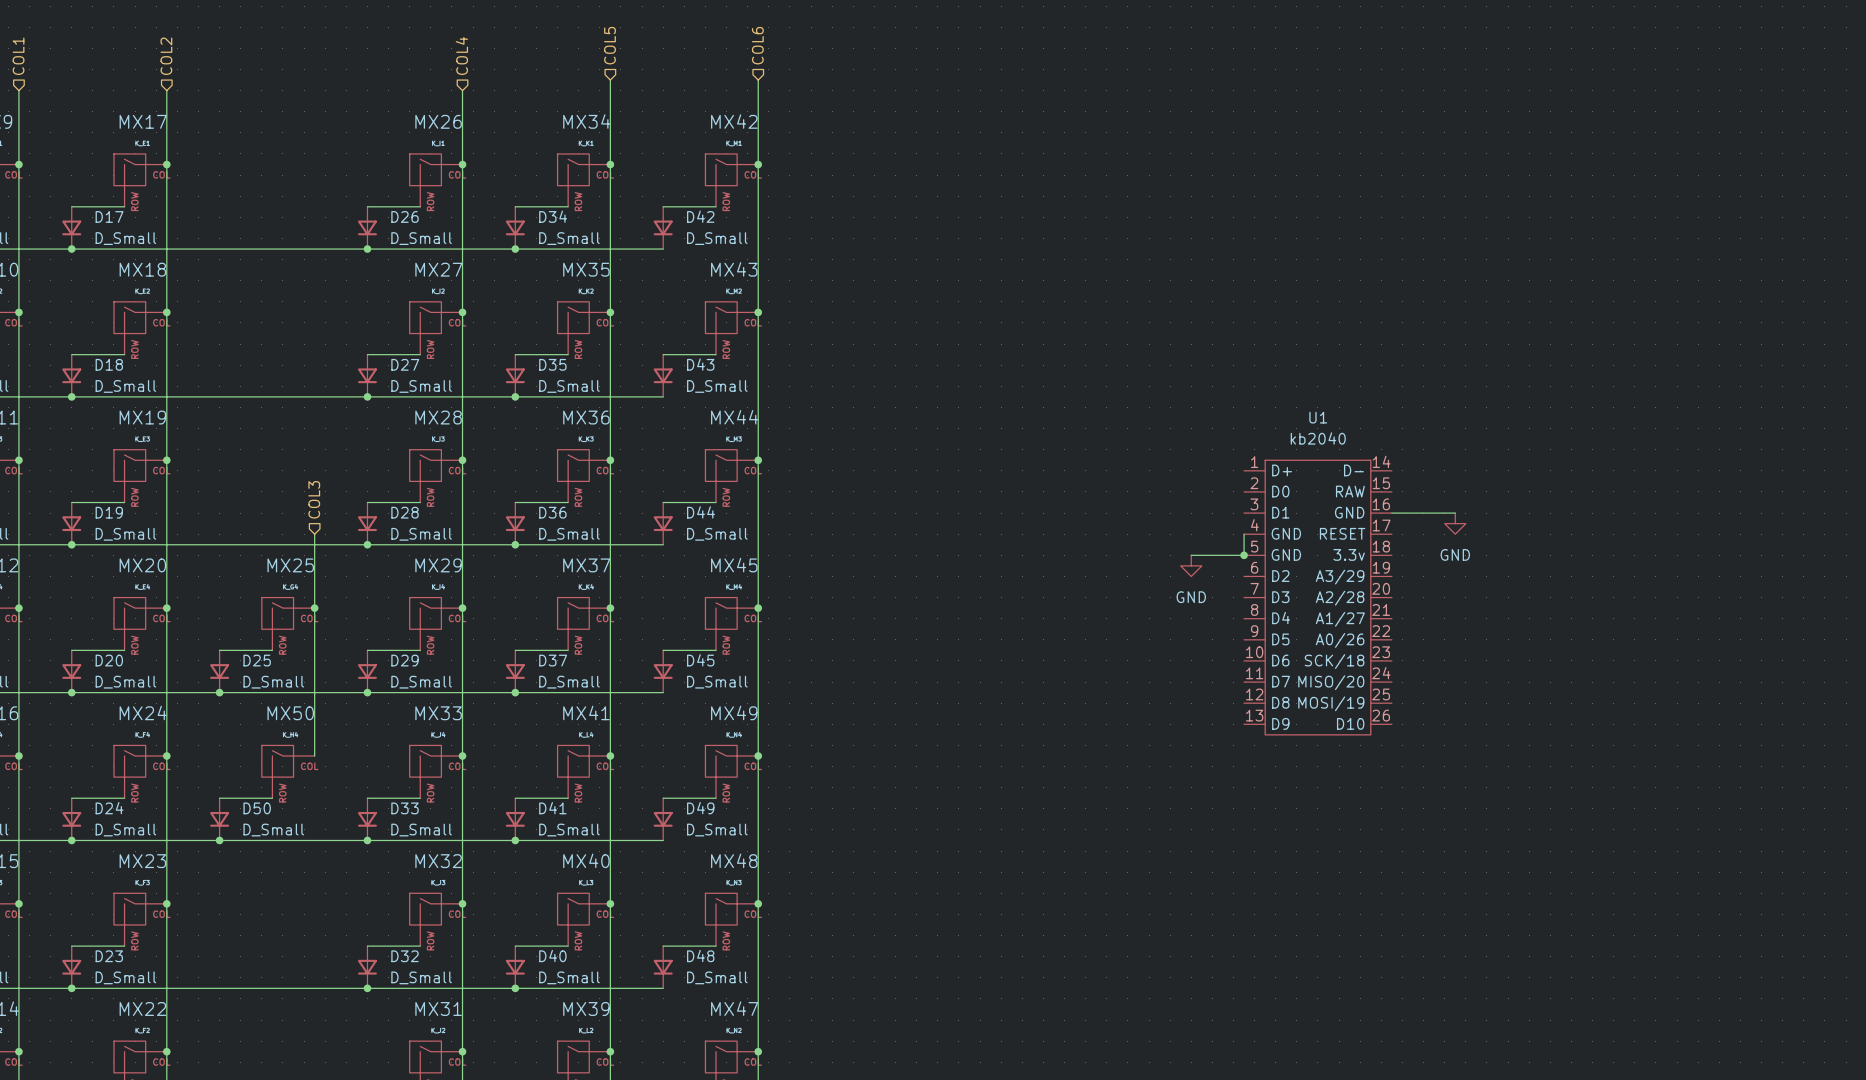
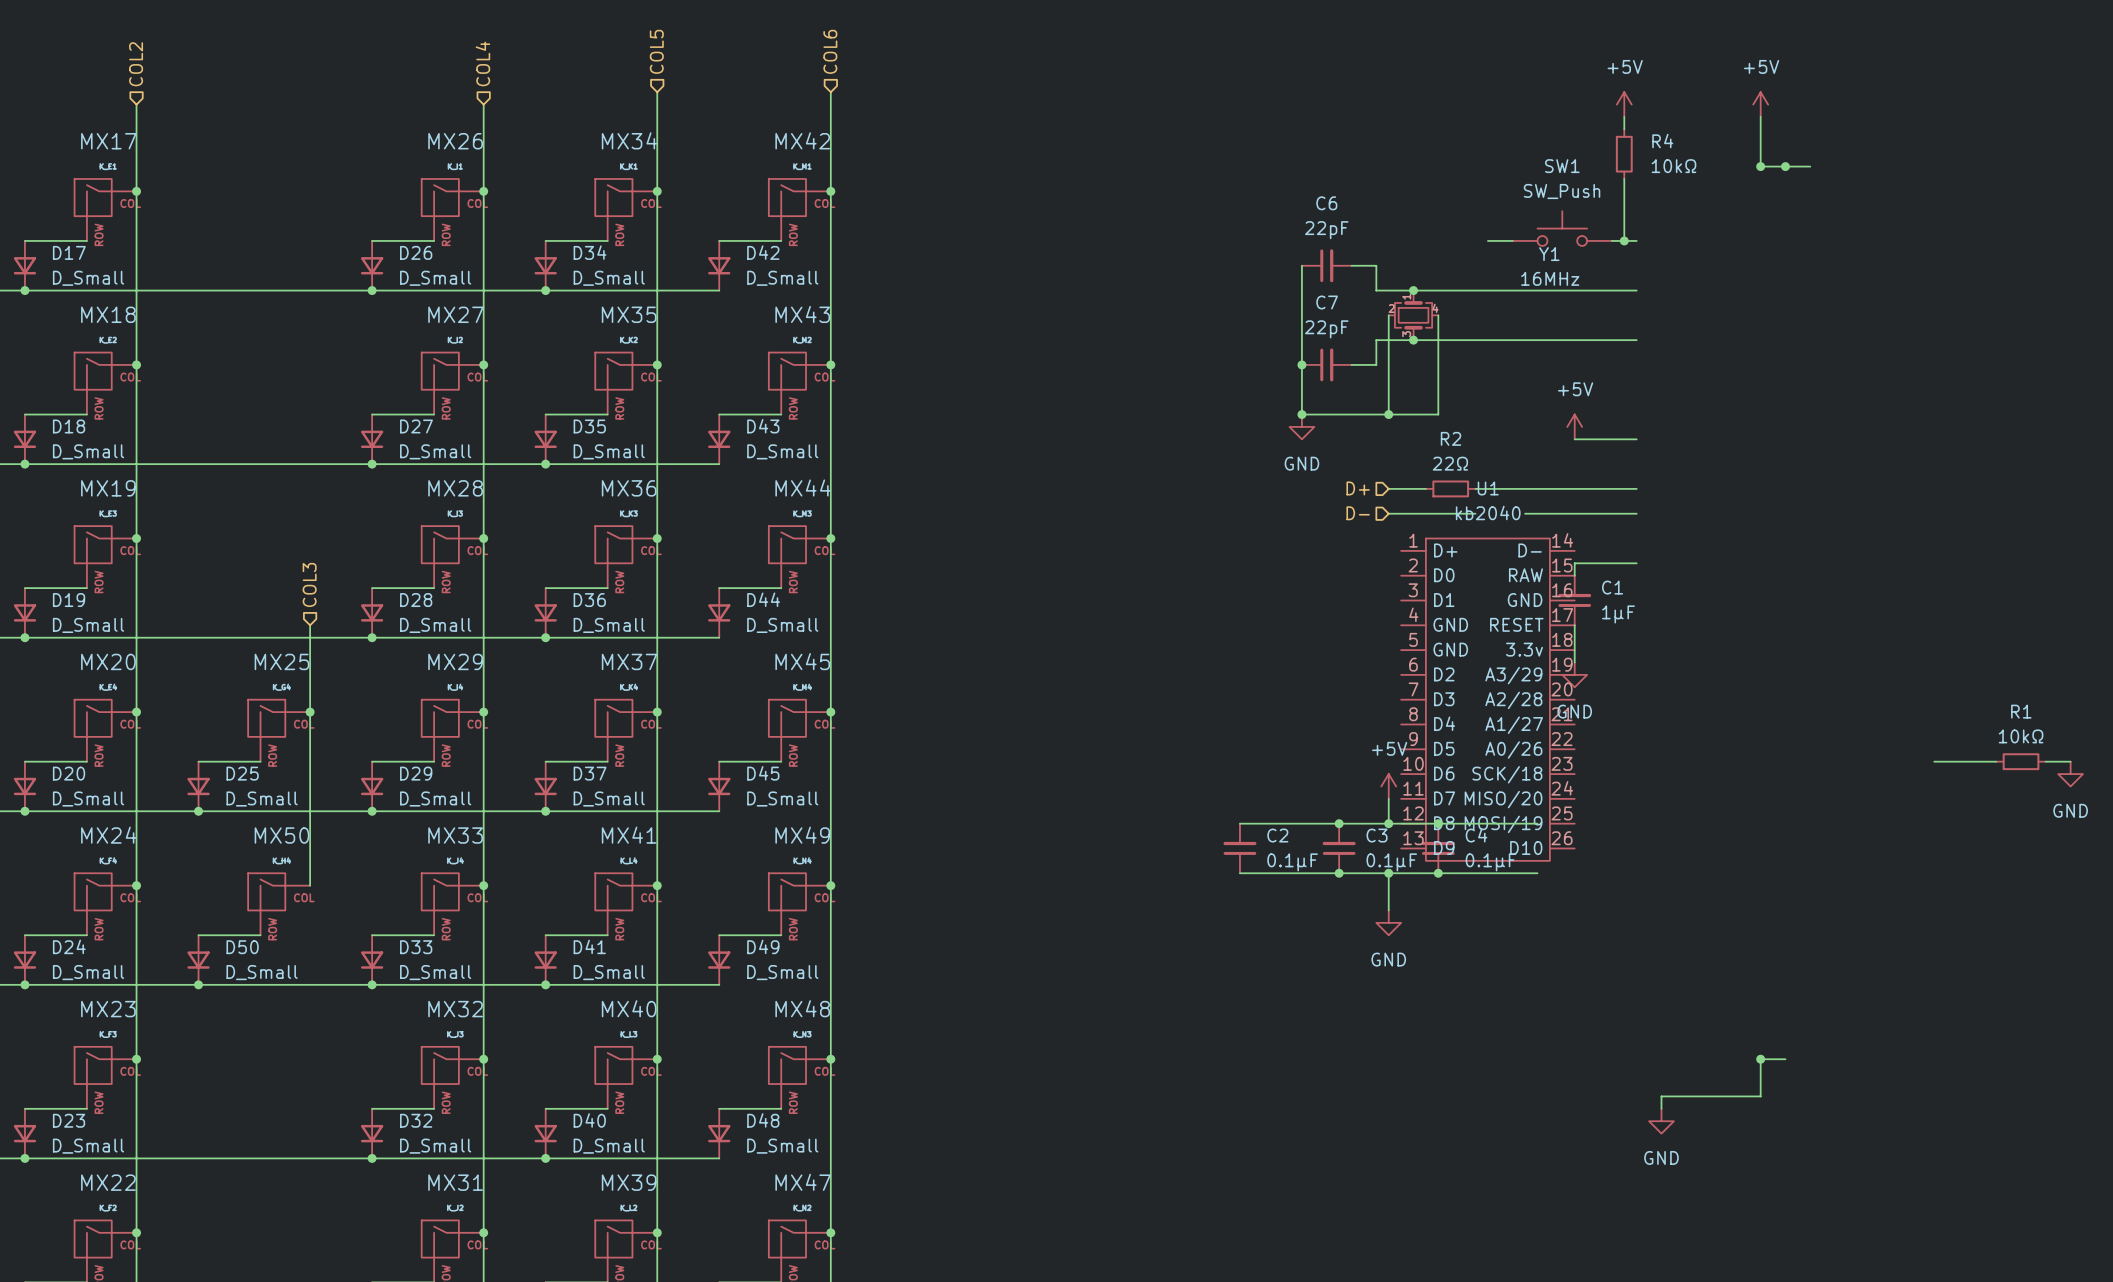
power symbol: none -> +5V (1624, 104)
power symbol: none -> +5V (1760, 104)
wire: none -> (1624, 116) (1624, 129)
wire: none -> (1760, 116) (1760, 166) (1810, 166)
R4: none -> 10kΩ (1624, 154)
junction: none -> (1760, 166)
junction: none -> (1785, 166)
wire: none -> (1624, 178) (1624, 240)
SW1: none -> SW_Push (1562, 228)
wire: none -> (1487, 240) (1512, 240)
wire: none -> (1611, 240) (1636, 240)
junction: none -> (1624, 240)
wire: none -> (1301, 265) (1301, 414) (1438, 414) (1438, 315)
C6: none -> 22pF (1326, 265)
wire: none -> (1351, 265) (1376, 265) (1376, 290) (1636, 290)
junction: none -> (1413, 290)
wire: none -> (1388, 315) (1388, 414)
Y1: none -> 16MHz (1413, 315)
junction: none -> (1413, 340)
wire: none -> (1636, 340) (1376, 340) (1376, 364) (1351, 364)
junction: none -> (1301, 364)
C7: none -> 22pF (1326, 364)
junction: none -> (1301, 414)
junction: none -> (1388, 414)
power symbol: none -> GND (1301, 426)
power symbol: none -> +5V (1574, 426)
wire: none -> (1574, 439) (1636, 439)
hierarchical label: none -> D+ (1358, 488)
wire: none -> (1388, 488) (1425, 488)
R2: none -> 22Ω (1450, 488)
wire: none -> (1475, 488) (1636, 488)
hierarchical label: none -> D- (1358, 513)
wire: none -> (1388, 513) (1475, 513)
wire: none -> (1525, 513) (1636, 513)
wire: none -> (1636, 563) (1574, 563) (1574, 575)
wire: (1391, 513) (1455, 513) -> none
C1: none -> 1µF (1574, 600)
power symbol position: GND (1455, 523) -> GND (1574, 674)
wire: (1244, 534) (1244, 555) (1191, 555) -> none
wire: none -> (1574, 625) (1574, 662)
junction: (1244, 555) -> none
power symbol: GND (1191, 565) -> none
wire: none -> (1934, 761) (1996, 761)
R1: none -> 10kΩ (2021, 761)
wire: none -> (2045, 761) (2070, 761)
power symbol: none -> GND (2070, 774)
power symbol: none -> +5V (1388, 786)
wire: none -> (1388, 798) (1388, 823)
wire: none -> (1239, 823) (1537, 823)
junction: none -> (1339, 823)
junction: none -> (1388, 823)
junction: none -> (1438, 823)
C2: none -> 0.1µF (1239, 848)
C3: none -> 0.1µF (1339, 848)
C4: none -> 0.1µF (1438, 848)
wire: none -> (1239, 873) (1537, 873)
junction: none -> (1339, 873)
wire: none -> (1388, 873) (1388, 910)
junction: none -> (1388, 873)
junction: none -> (1438, 873)
power symbol: none -> GND (1388, 922)
junction: none -> (1760, 1059)
wire: none -> (1785, 1059) (1760, 1059) (1760, 1096) (1661, 1096) (1661, 1108)
power symbol: none -> GND (1661, 1121)

